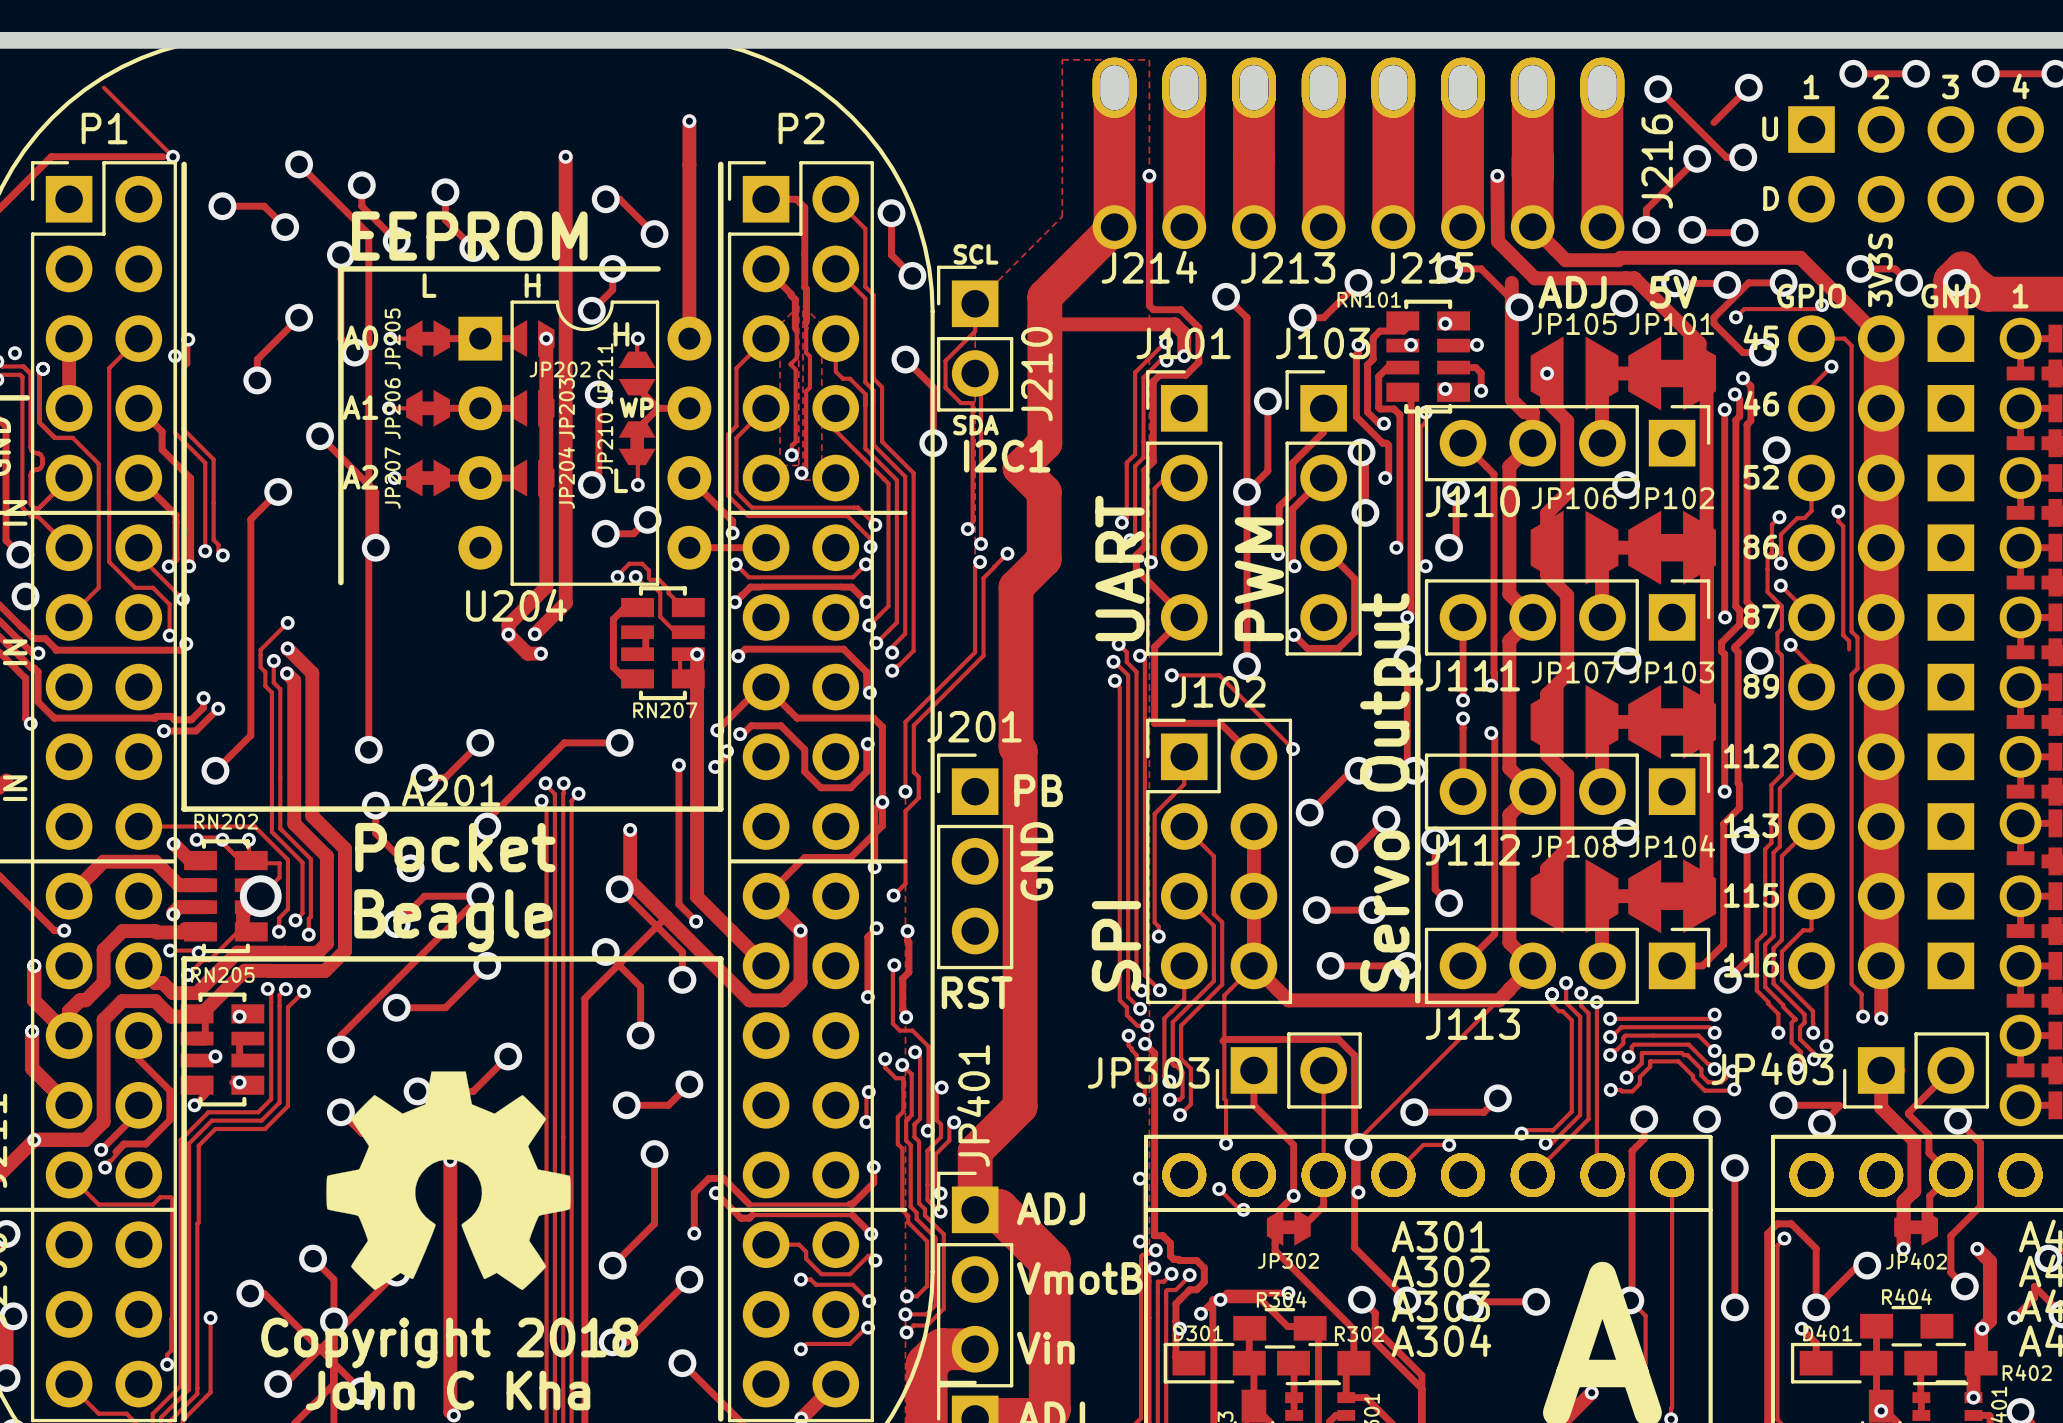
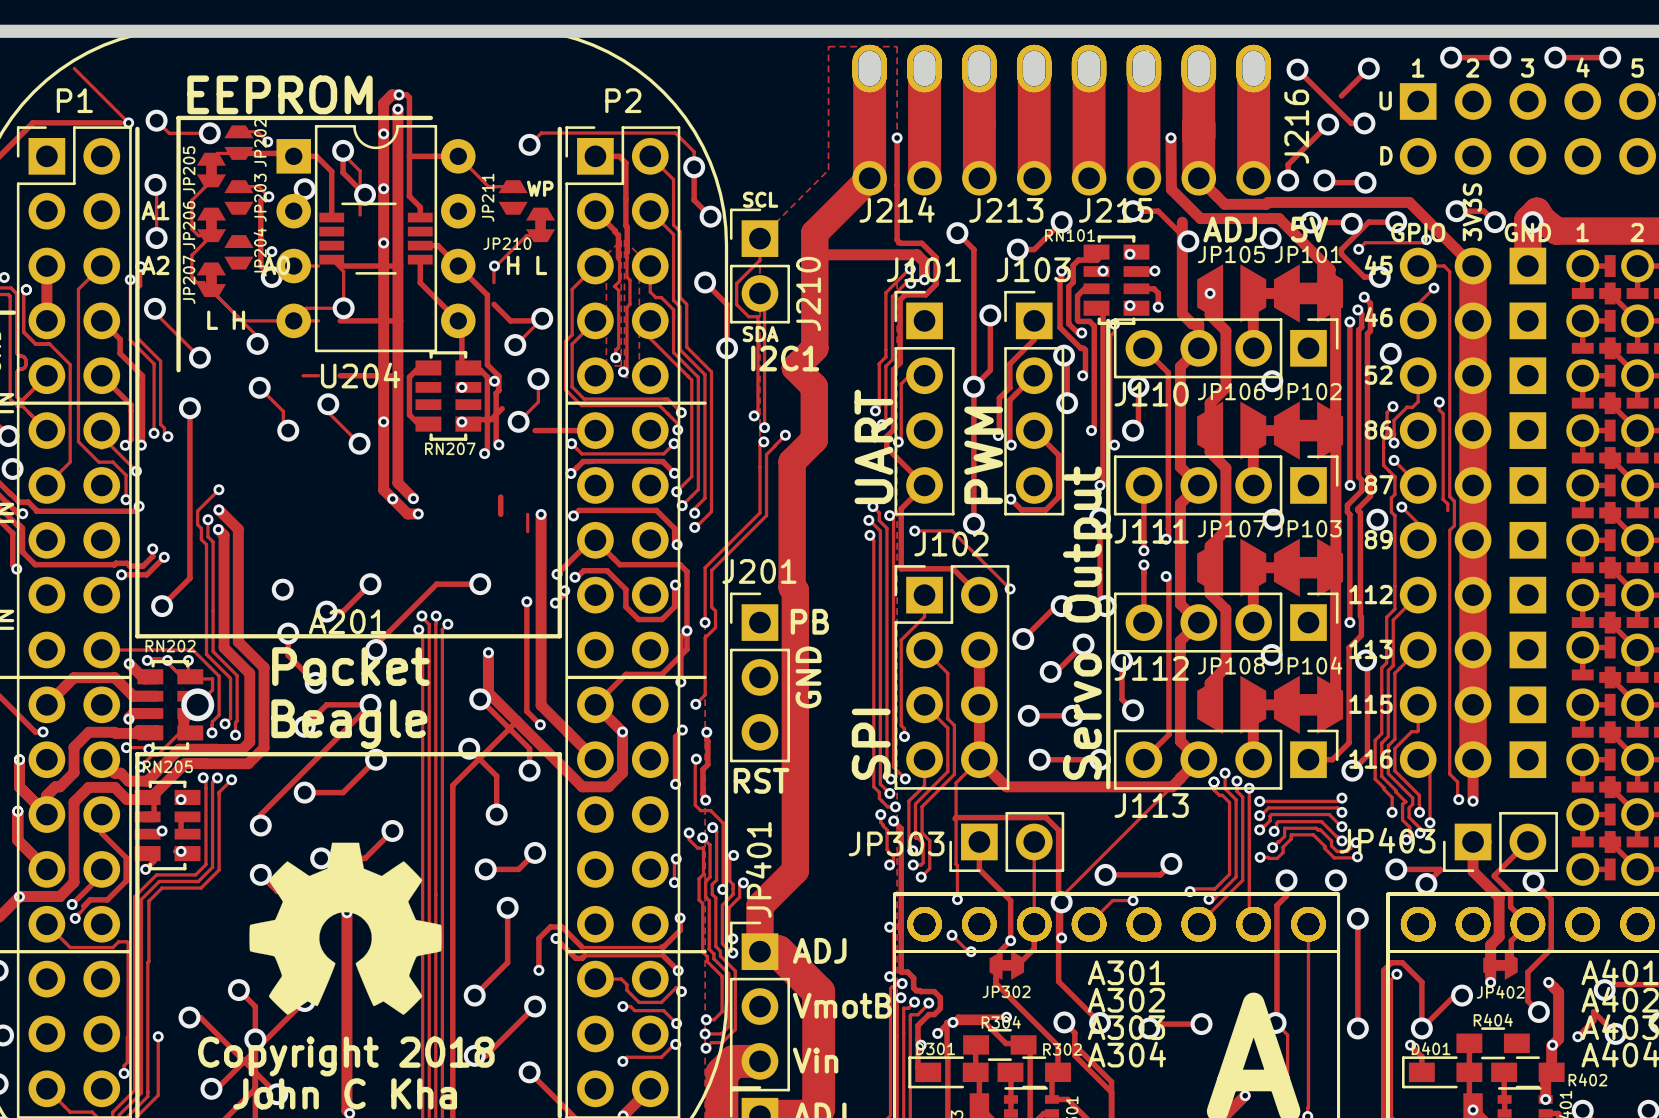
via: none -> (399, 94)
track: (689, 121) (689, 338) -> none
via: (689, 121) -> none
via: none -> (397, 109)
line: none -> (430, 117) (178, 117) (178, 370)
track: none -> (156, 120) (169, 133) (209, 133)
via: none -> (156, 120)
track: (565, 156) (565, 603) (534, 634) -> (397, 109) (397, 483) (413, 498)
via: (565, 156) -> none
track: (299, 164) (368, 234) (368, 749) -> none
via position: (299, 164) -> (209, 133)
track: none -> (238, 131) (257, 131) (267, 141)
via: none -> (383, 133)
via size: [347, 171, 376, 200] -> [262, 136, 274, 148]
track: none -> (529, 144) (541, 133) (675, 133) (694, 151) (694, 167)
via: none -> (529, 144)
track: (361, 185) (361, 206) (396, 241) -> none
track: none -> (339, 150) (360, 171) (360, 215)
track: none -> (409, 156) (458, 156) (488, 186) (513, 186)
track: (605, 199) (619, 199) (654, 234) -> none
via: (605, 199) -> none
track: none -> (211, 159) (217, 153) (290, 153) (293, 156) (316, 156) (331, 171) (331, 217)
track: (222, 206) (264, 206) (285, 227) -> none
via: (222, 206) -> none
via: (285, 227) -> none
track: none -> (211, 180) (191, 200) (191, 229) (198, 235) (211, 235) (191, 255) (191, 277) (197, 282) (203, 282) (257, 336) (257, 343)
via: (654, 234) -> none
track: none -> (155, 184) (156, 238)
via: none -> (155, 184)
text position: EEPROM (469, 236) -> EEPROM (279, 94)
track: none -> (238, 186) (258, 186) (268, 196)
via: none -> (383, 188)
via size: [326, 241, 355, 269] -> [263, 191, 275, 203]
track: (612, 268) (612, 289) (591, 310) -> none
via: (612, 268) -> none
line: (658, 268) (340, 268) (340, 582) -> none
text: L (429, 285) -> none
text: H (532, 285) -> none
U204 footprint: [458, 300, 712, 586] -> [276, 125, 476, 353]
track: none -> (540, 235) (526, 235) (492, 269)
via: none -> (156, 238)
via: none -> (383, 242)
via: (591, 310) -> none
track: none -> (420, 245) (437, 245) (487, 295) (487, 364) (498, 376) (498, 390) (496, 393) (496, 442) (498, 444)
track: (299, 317) (257, 359) (257, 380) -> none
via: (299, 317) -> none
track: none -> (331, 259) (343, 271) (343, 308) (306, 308) (293, 320) (241, 320)
track: none -> (420, 259) (420, 282) (461, 324) (461, 370) (480, 370) (487, 377) (487, 450) (484, 453)
text position: H (621, 334) -> H (513, 265)
text: none -> L (541, 265)
via position: (390, 338) -> (271, 251)
JP205 rotation: 0° (428, 338) -> 90° clockwise (211, 170)
JP205 position: (428, 338) -> (211, 170)
JP202 rotation: 0° (532, 338) -> 90° clockwise (238, 142)
JP202 position: (532, 338) -> (238, 142)
track: (546, 338) (546, 586) (508, 624) (508, 634) -> (420, 217) (420, 207) (409, 196) (409, 97) (406, 94) (392, 94) (383, 103) (383, 489) (392, 498)
via: (546, 338) -> none
JP211 position: (637, 373) -> (513, 197)
via: (257, 380) -> none
via: none -> (343, 308)
track: none -> (154, 308) (154, 312) (199, 357)
via: none -> (154, 308)
track: (598, 394) (598, 478) (591, 485) -> none
via: (598, 394) -> none
track: none -> (542, 318) (515, 345)
via: none -> (542, 318)
text: none -> L (212, 320)
text: none -> H (238, 320)
text position: A1 (360, 407) -> A1 (155, 210)
text position: WP (636, 407) -> WP (540, 188)
via: (389, 408) -> none
JP206 rotation: 0° (428, 408) -> 90° clockwise (211, 224)
JP206 position: (428, 408) -> (211, 224)
JP203 rotation: 0° (532, 408) -> 90° clockwise (238, 197)
JP203 position: (532, 408) -> (238, 197)
track: (658, 408) (637, 429) -> none
track: (320, 436) (375, 491) (375, 547) -> none
via position: (320, 436) -> (257, 343)
via: none -> (515, 345)
JP210 name rotation: 0° (605, 443) -> 90° clockwise (507, 243)
JP210 position: (637, 443) -> (540, 224)
via: none -> (199, 357)
track: (637, 456) (637, 485) -> none
via size: [577, 471, 606, 499] -> [456, 381, 468, 393]
text position: A2 (360, 477) -> A2 (155, 265)
via: (394, 478) -> none
JP207 rotation: 0° (428, 478) -> 90° clockwise (211, 279)
JP207 position: (428, 478) -> (211, 279)
JP204 rotation: 0° (532, 478) -> 90° clockwise (238, 252)
JP204 position: (532, 478) -> (238, 252)
track: (689, 478) (732, 521) (732, 533) -> none
text: L (621, 480) -> none
track: none -> (538, 379) (538, 402) (518, 421)
via: none -> (538, 379)
track: (278, 491) (250, 519) -> none
via: (278, 491) -> none
track: none -> (259, 387) (283, 411) (283, 438)
via: none -> (259, 387)
track: none -> (328, 404) (328, 412) (359, 443)
via: none -> (328, 404)
via: none -> (189, 408)
via size: [591, 519, 620, 548] -> [456, 416, 468, 428]
via position: (647, 519) -> (518, 421)
via: (732, 533) -> none
via: none -> (383, 421)
via: none -> (359, 443)
via: none -> (498, 444)
track: (617, 577) (629, 563) (642, 563) (648, 570) (650, 579) (658, 579) (668, 589) (668, 593) (680, 604) (680, 610) -> none
via: (617, 577) -> none
via: none -> (484, 453)
track: (635, 577) (646, 588) (655, 588) (660, 592) (660, 616) (675, 632) (680, 632) -> none
via: (635, 577) -> none
track: (645, 610) (622, 610) (613, 619) (613, 667) (622, 676) (645, 676) -> (434, 370) (416, 370) (409, 377) (409, 414) (416, 421) (434, 421)
RN207 position: (662, 643) -> (448, 396)

